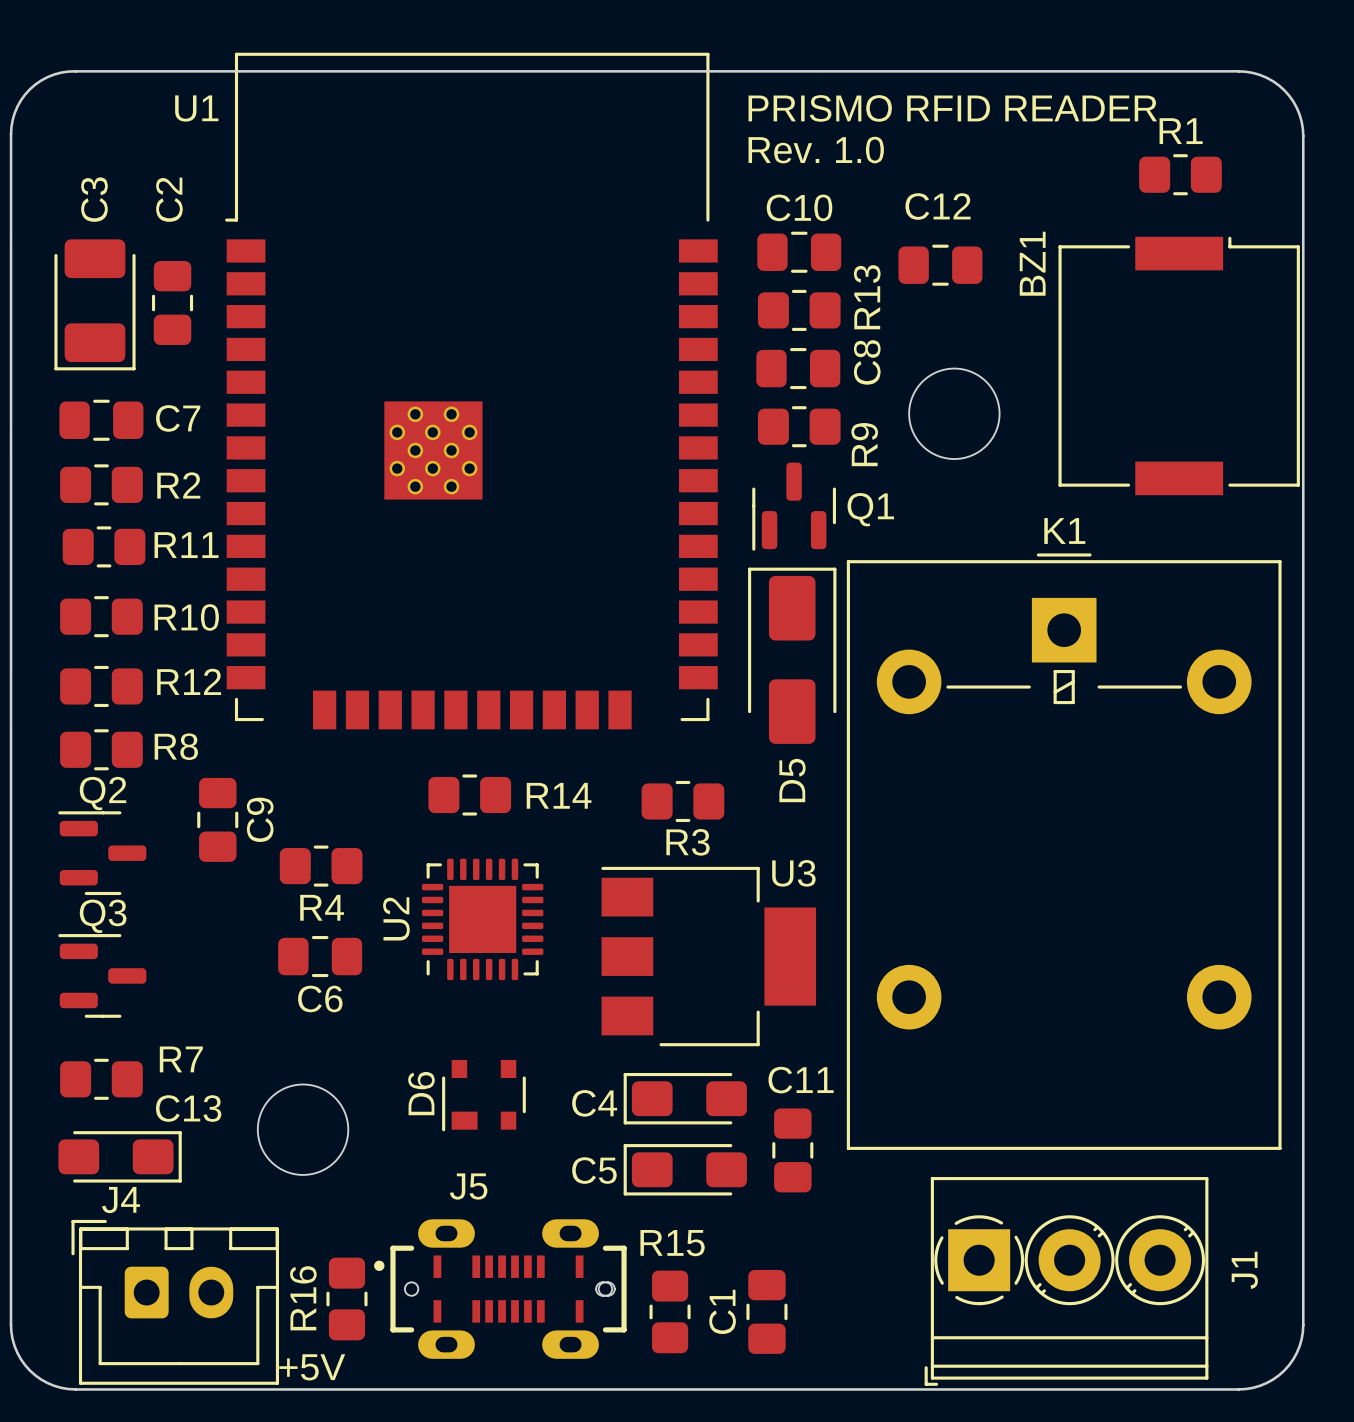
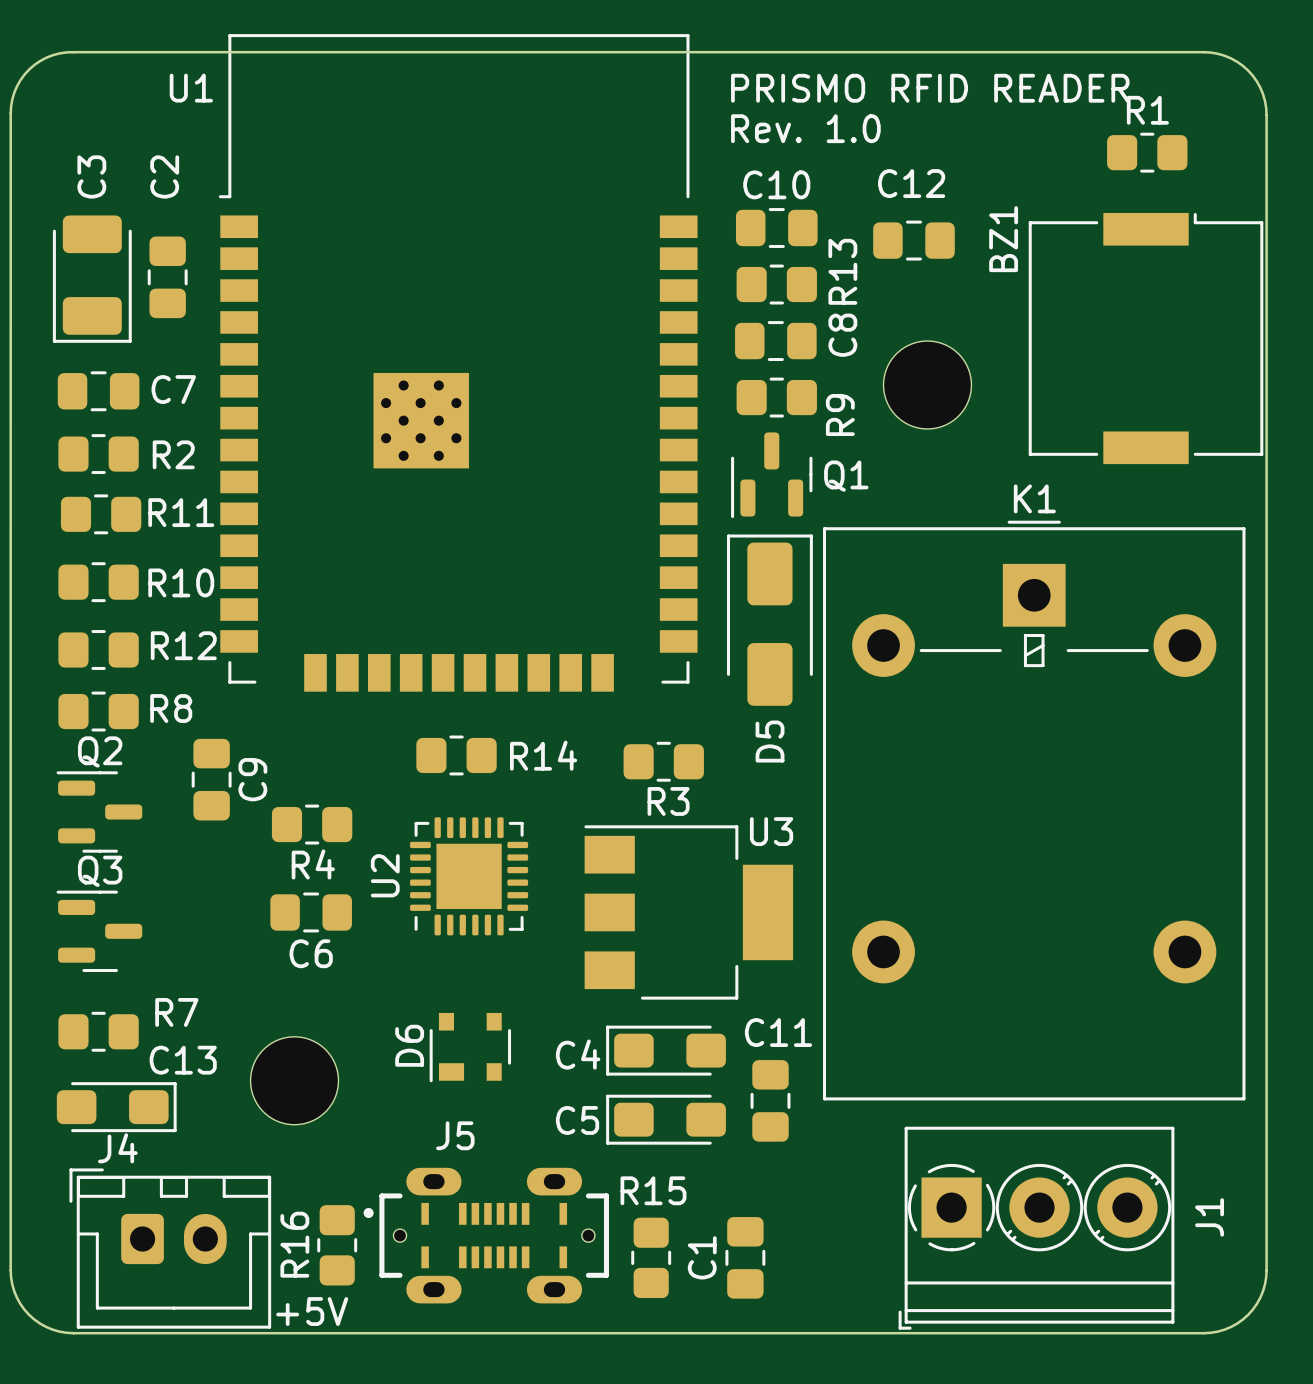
J5 footprint: [374, 1219, 627, 1359] -> [363, 1167, 609, 1304]

